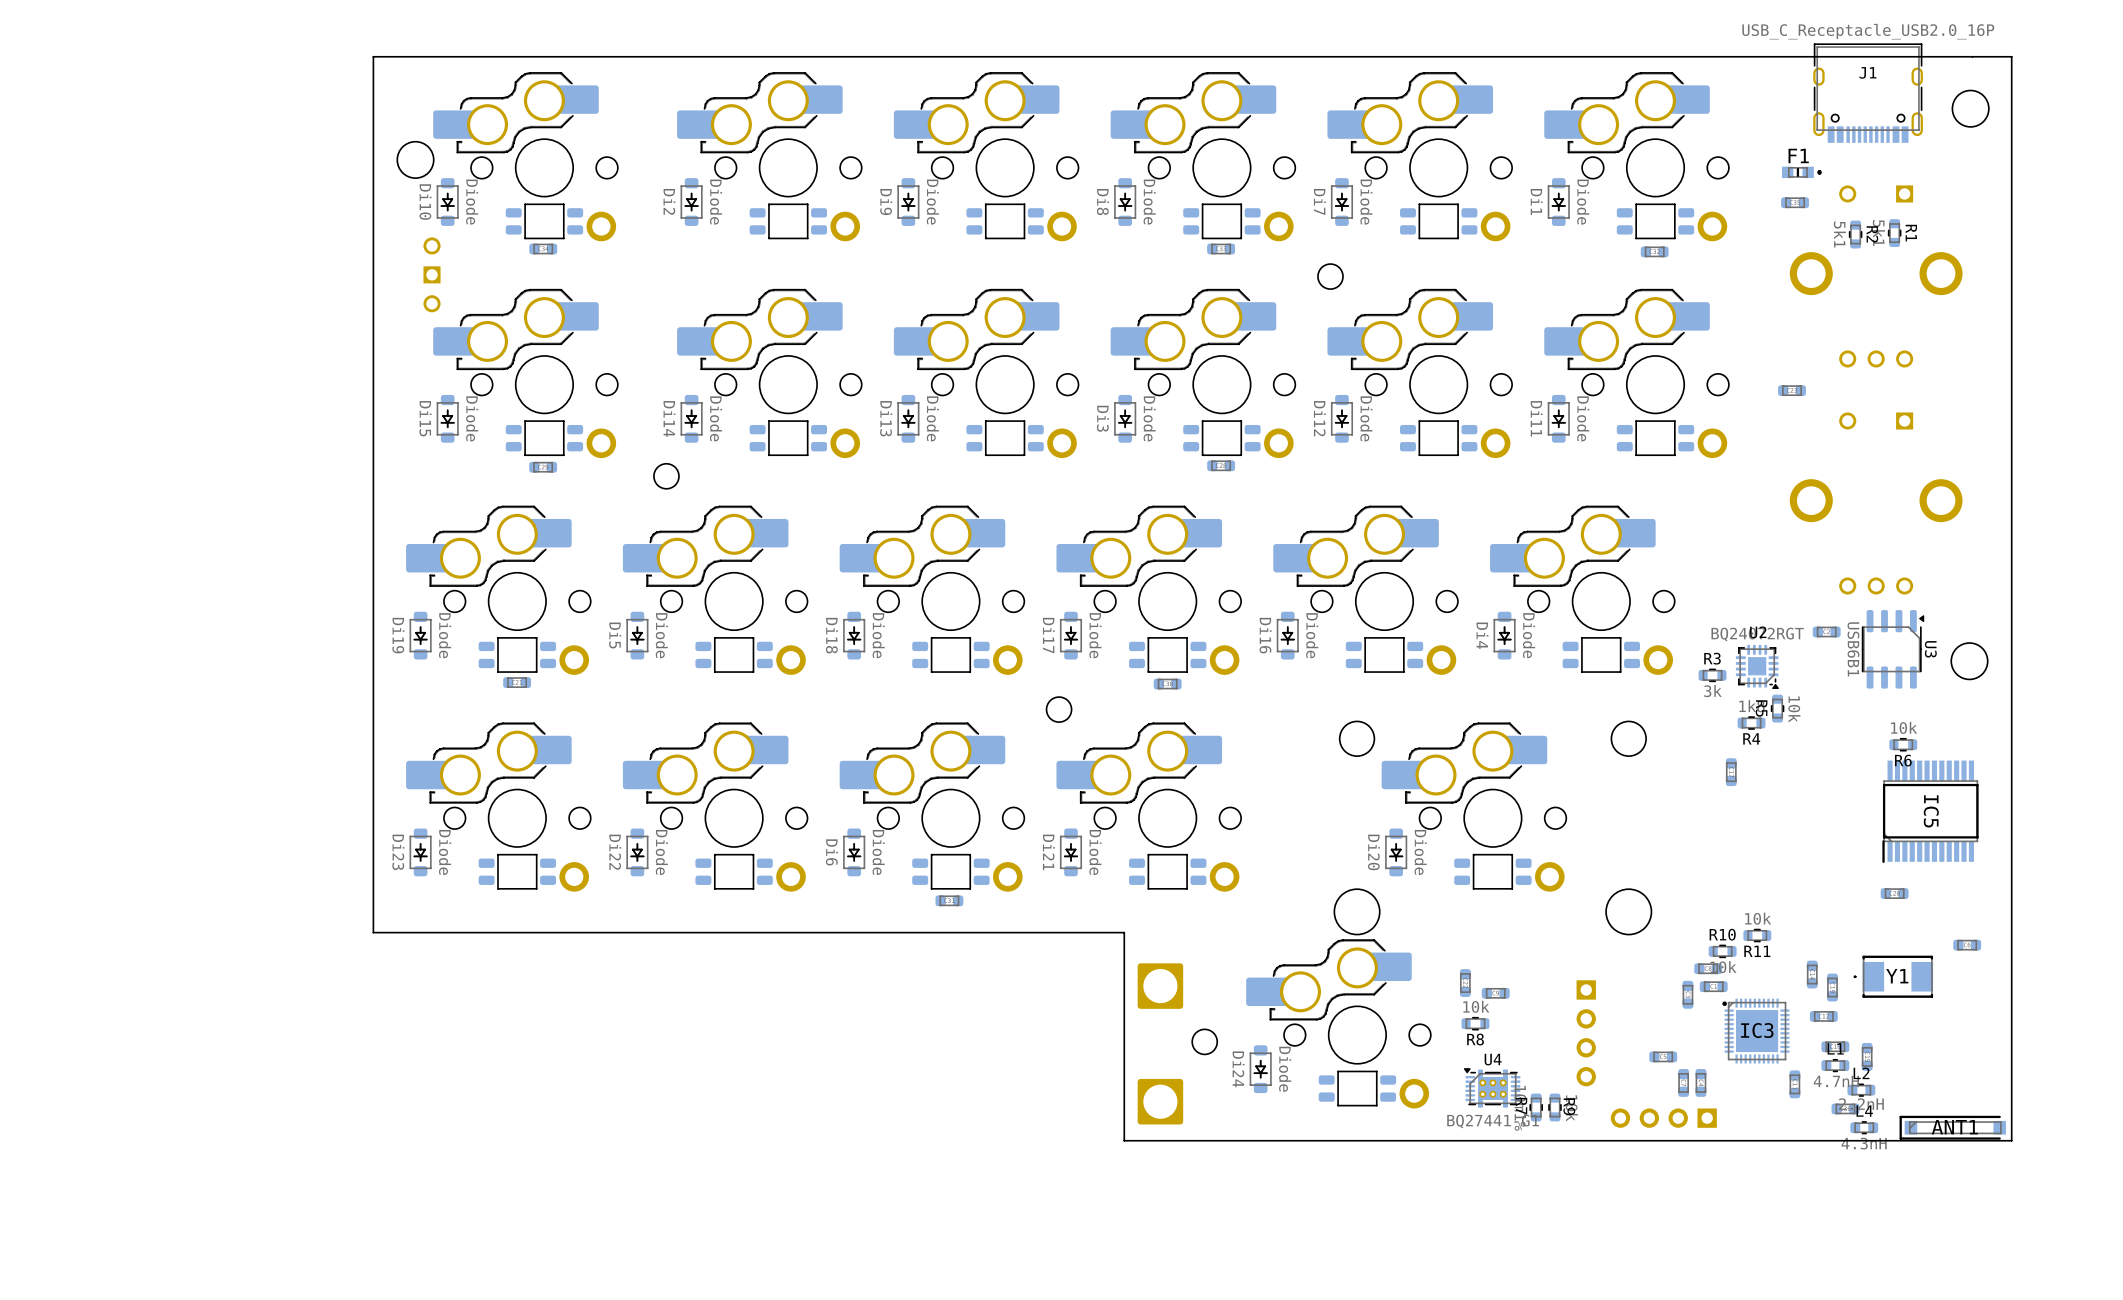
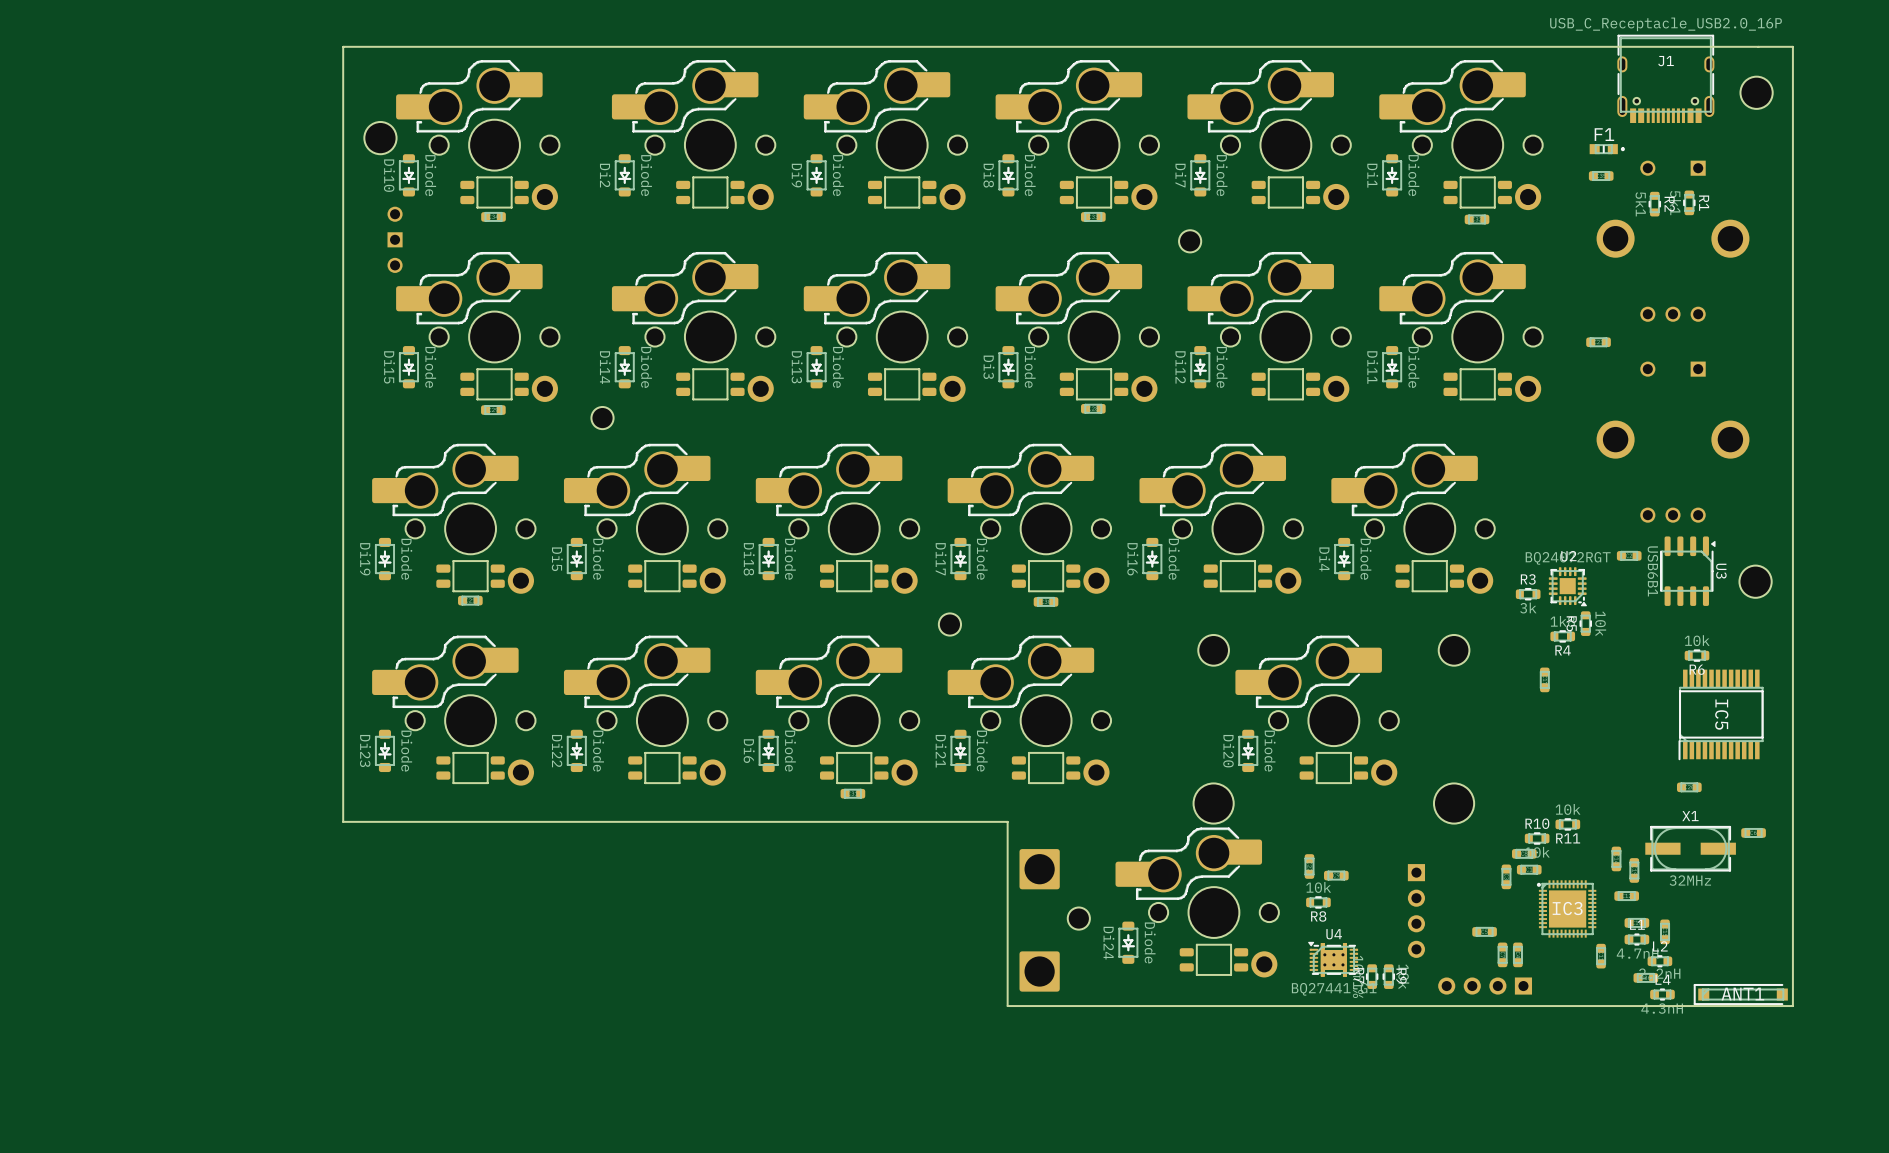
X1: none -> 32MHz (1690, 848)
Y1: (1893, 976) -> none

